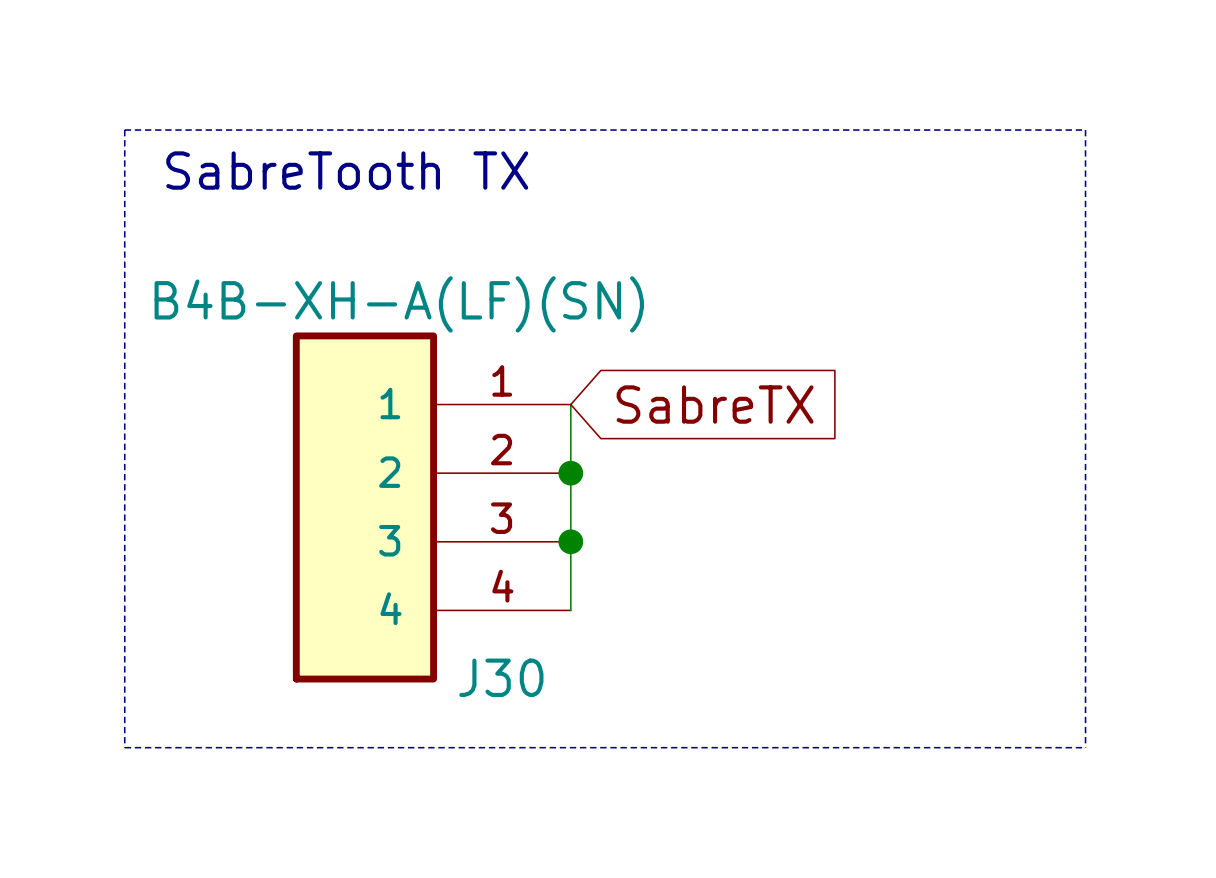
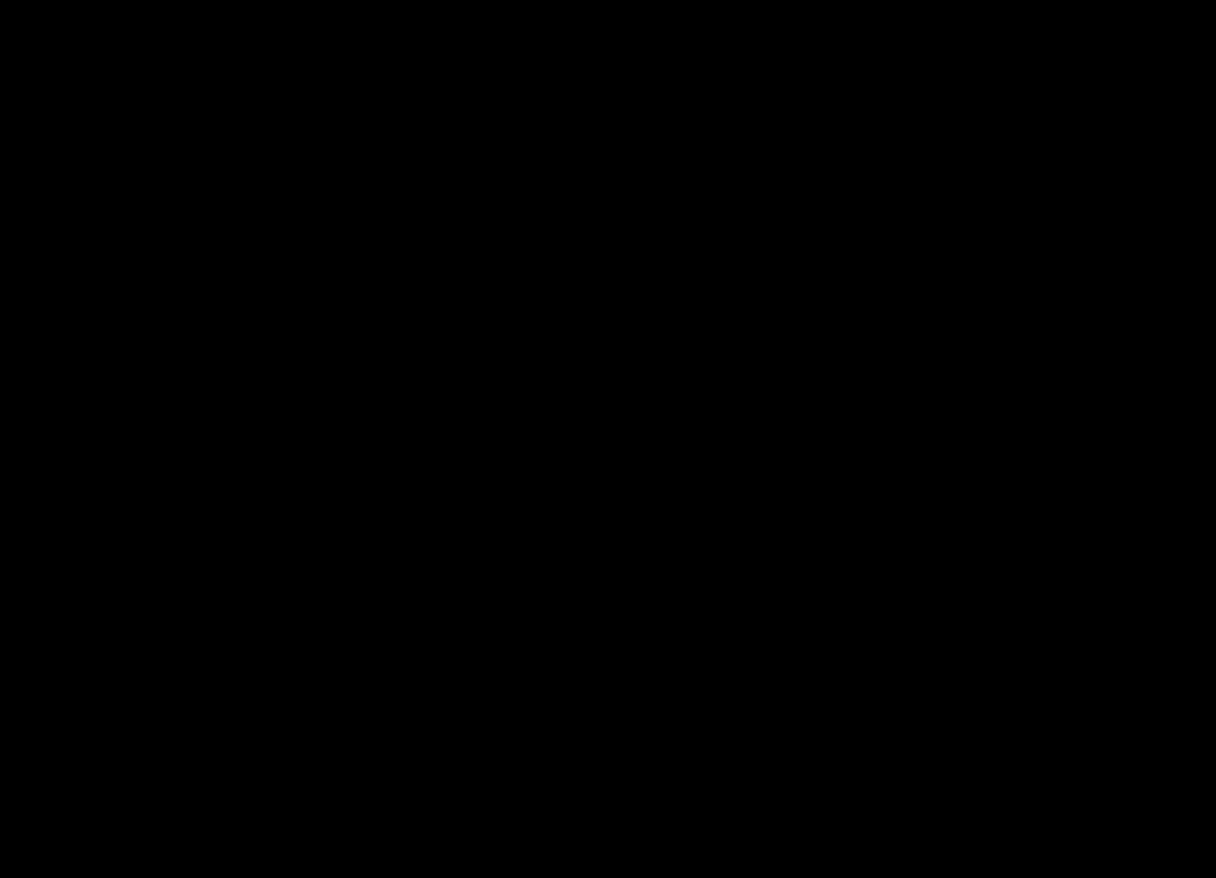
line: (124, 130) (1085, 130) (1085, 747) (124, 747) (124, 130) -> none
text: SabreTooth TX (347, 170) -> none
wire: (570, 404) (570, 610) -> none
global label: SabreTX (715, 404) -> none
junction: (570, 473) -> none
J30: B4B-XH-A(LF)(SN) (431, 507) -> none
junction: (570, 541) -> none

